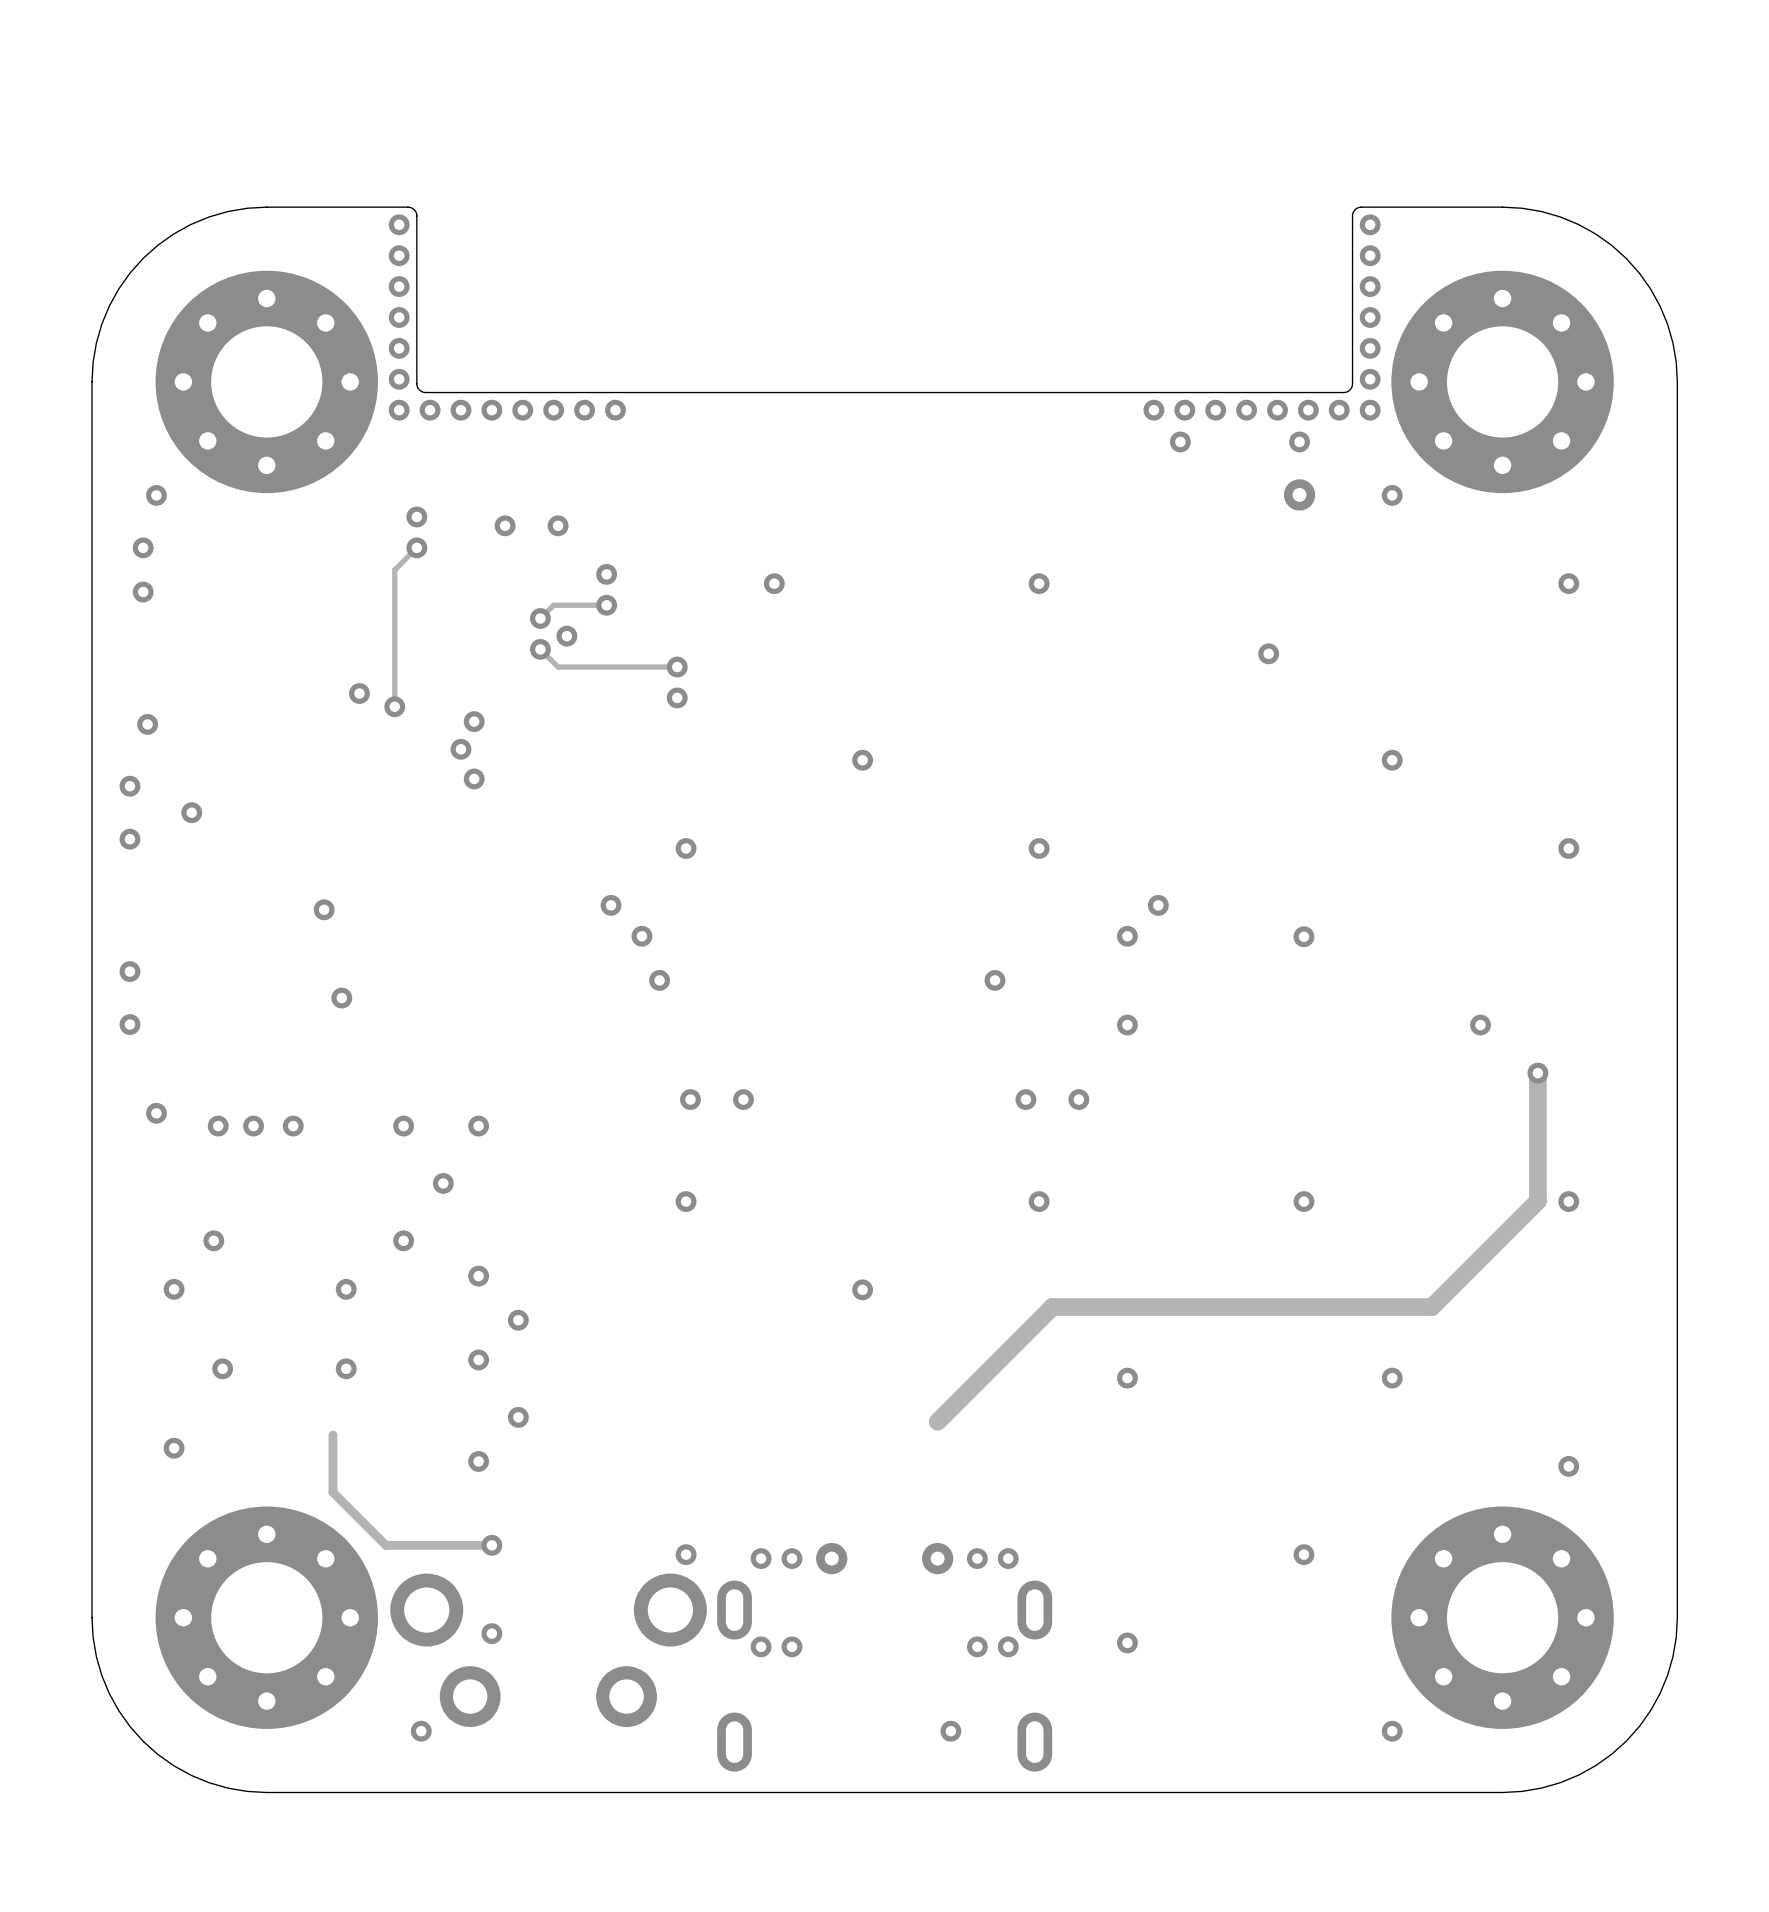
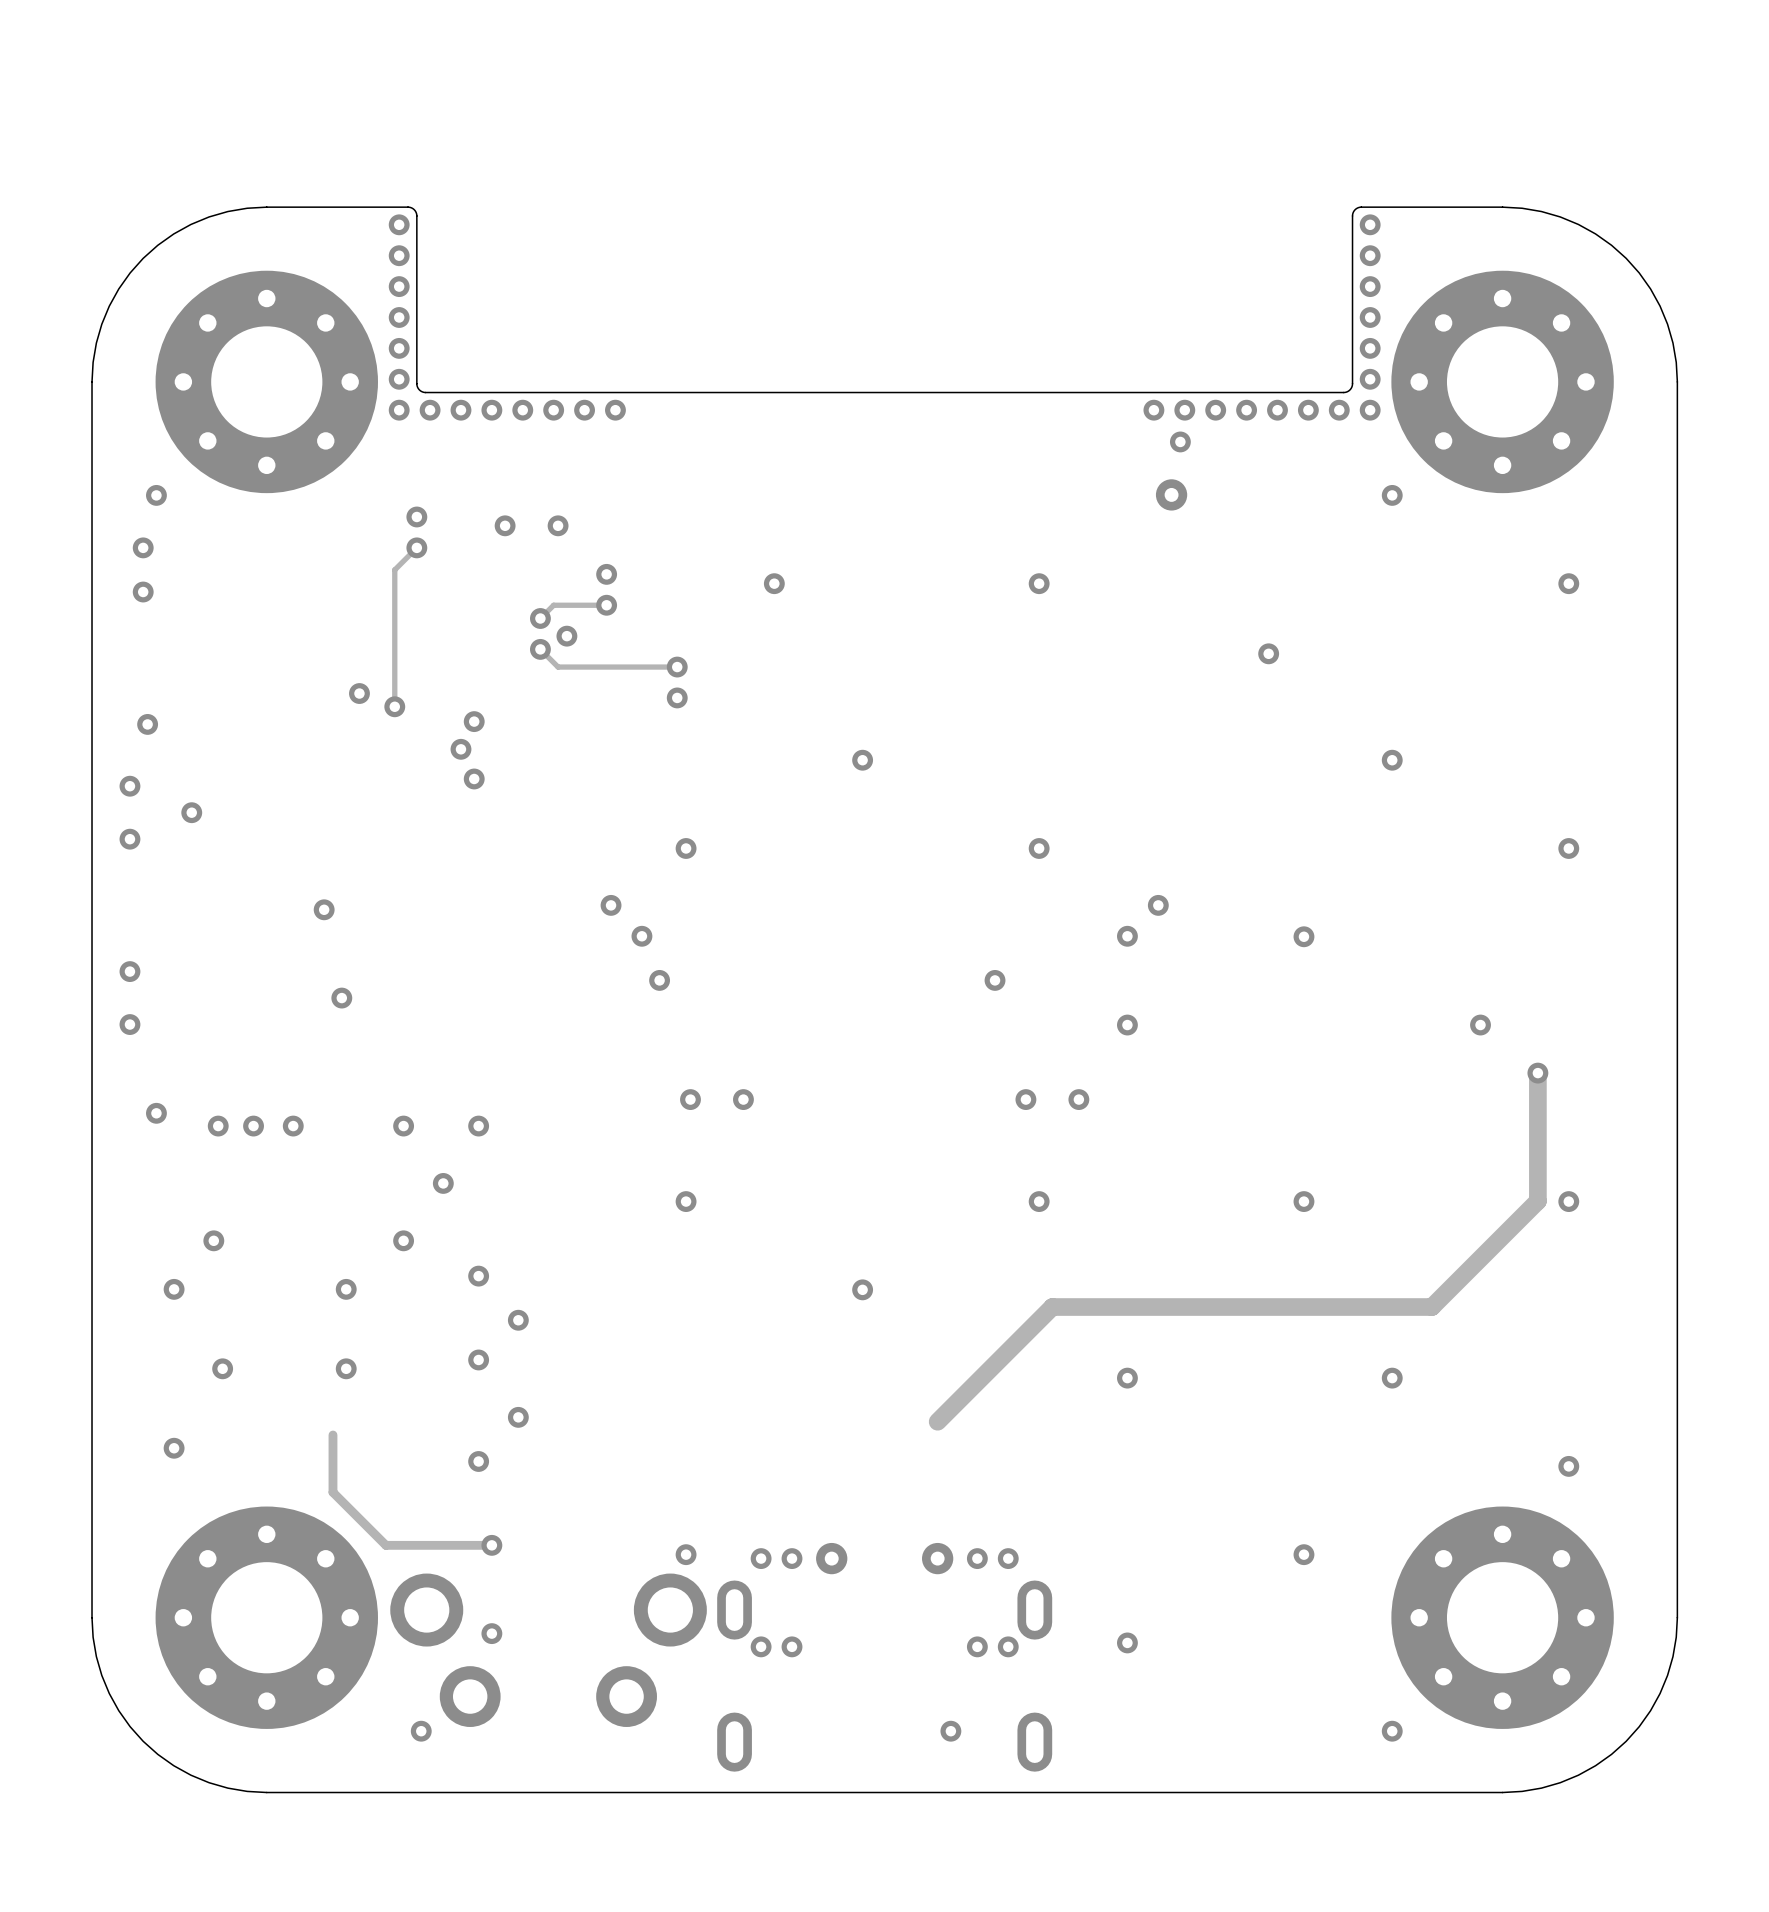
via: (1299, 441) -> none
via position: (1299, 494) -> (1171, 494)

